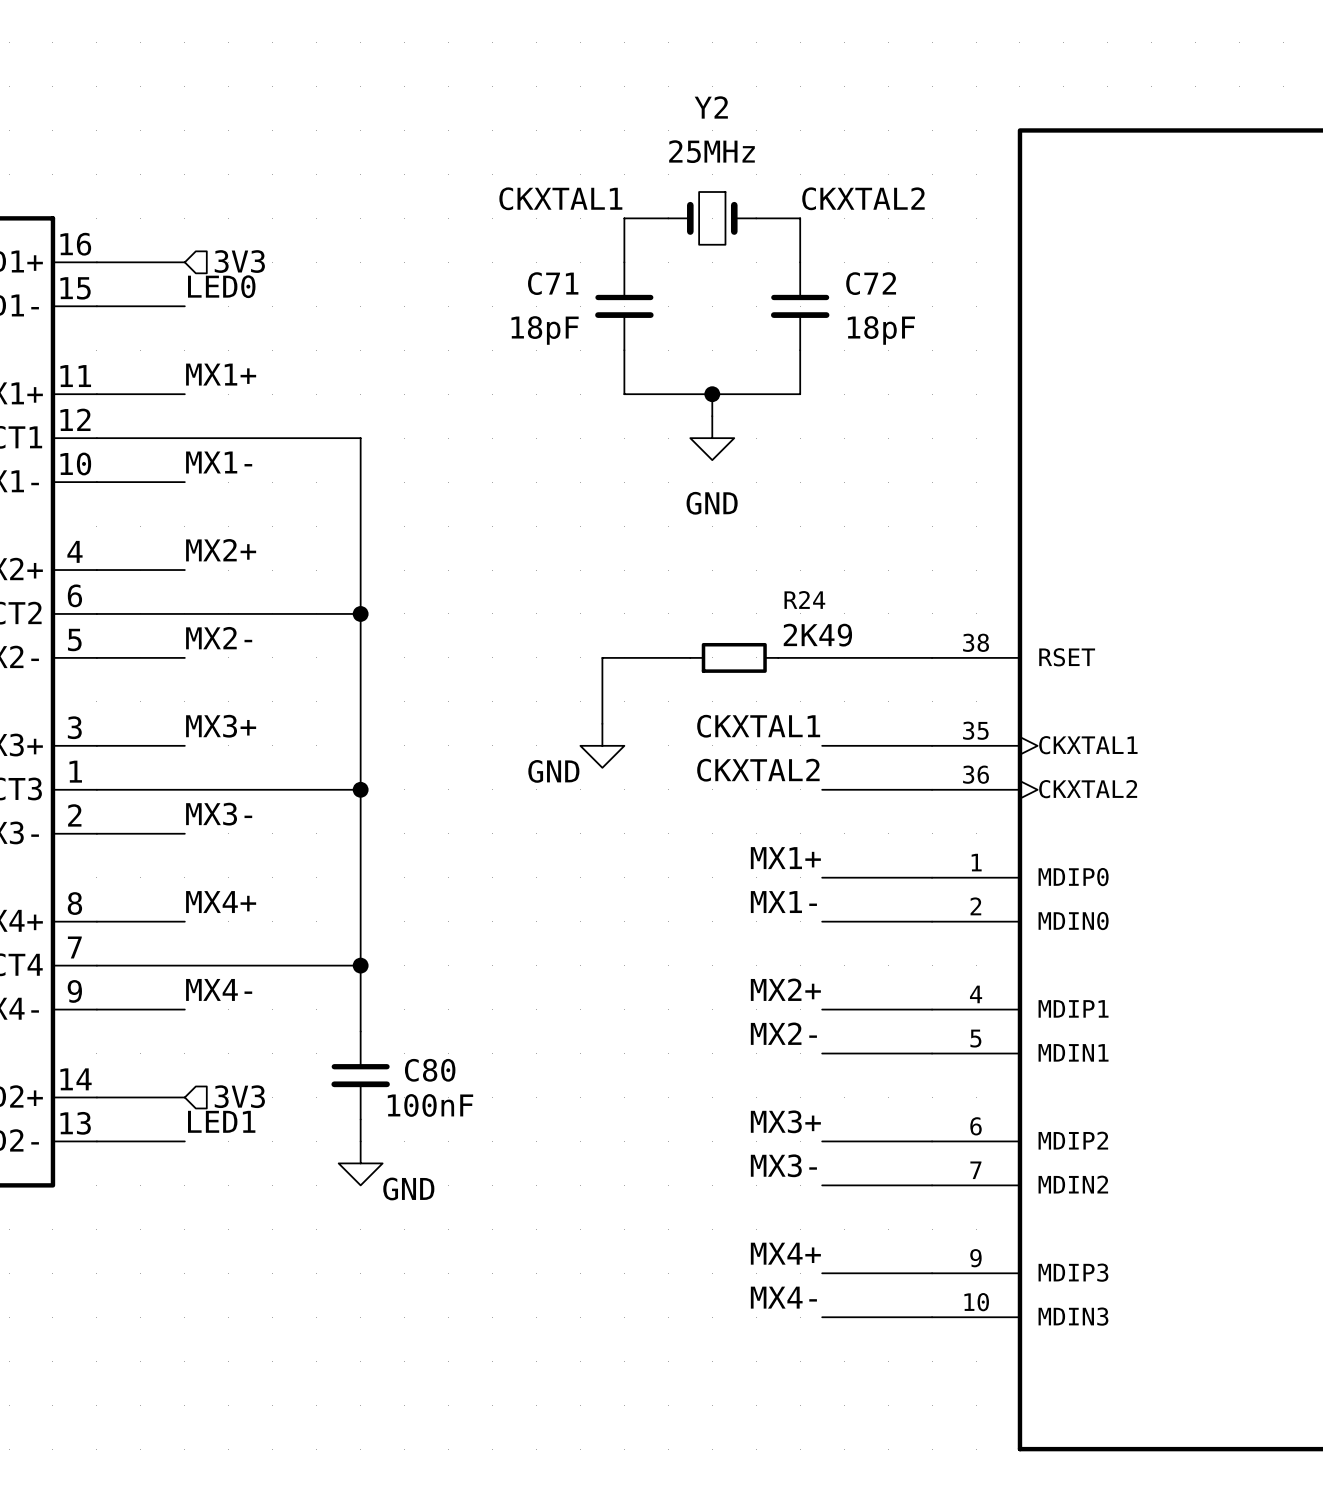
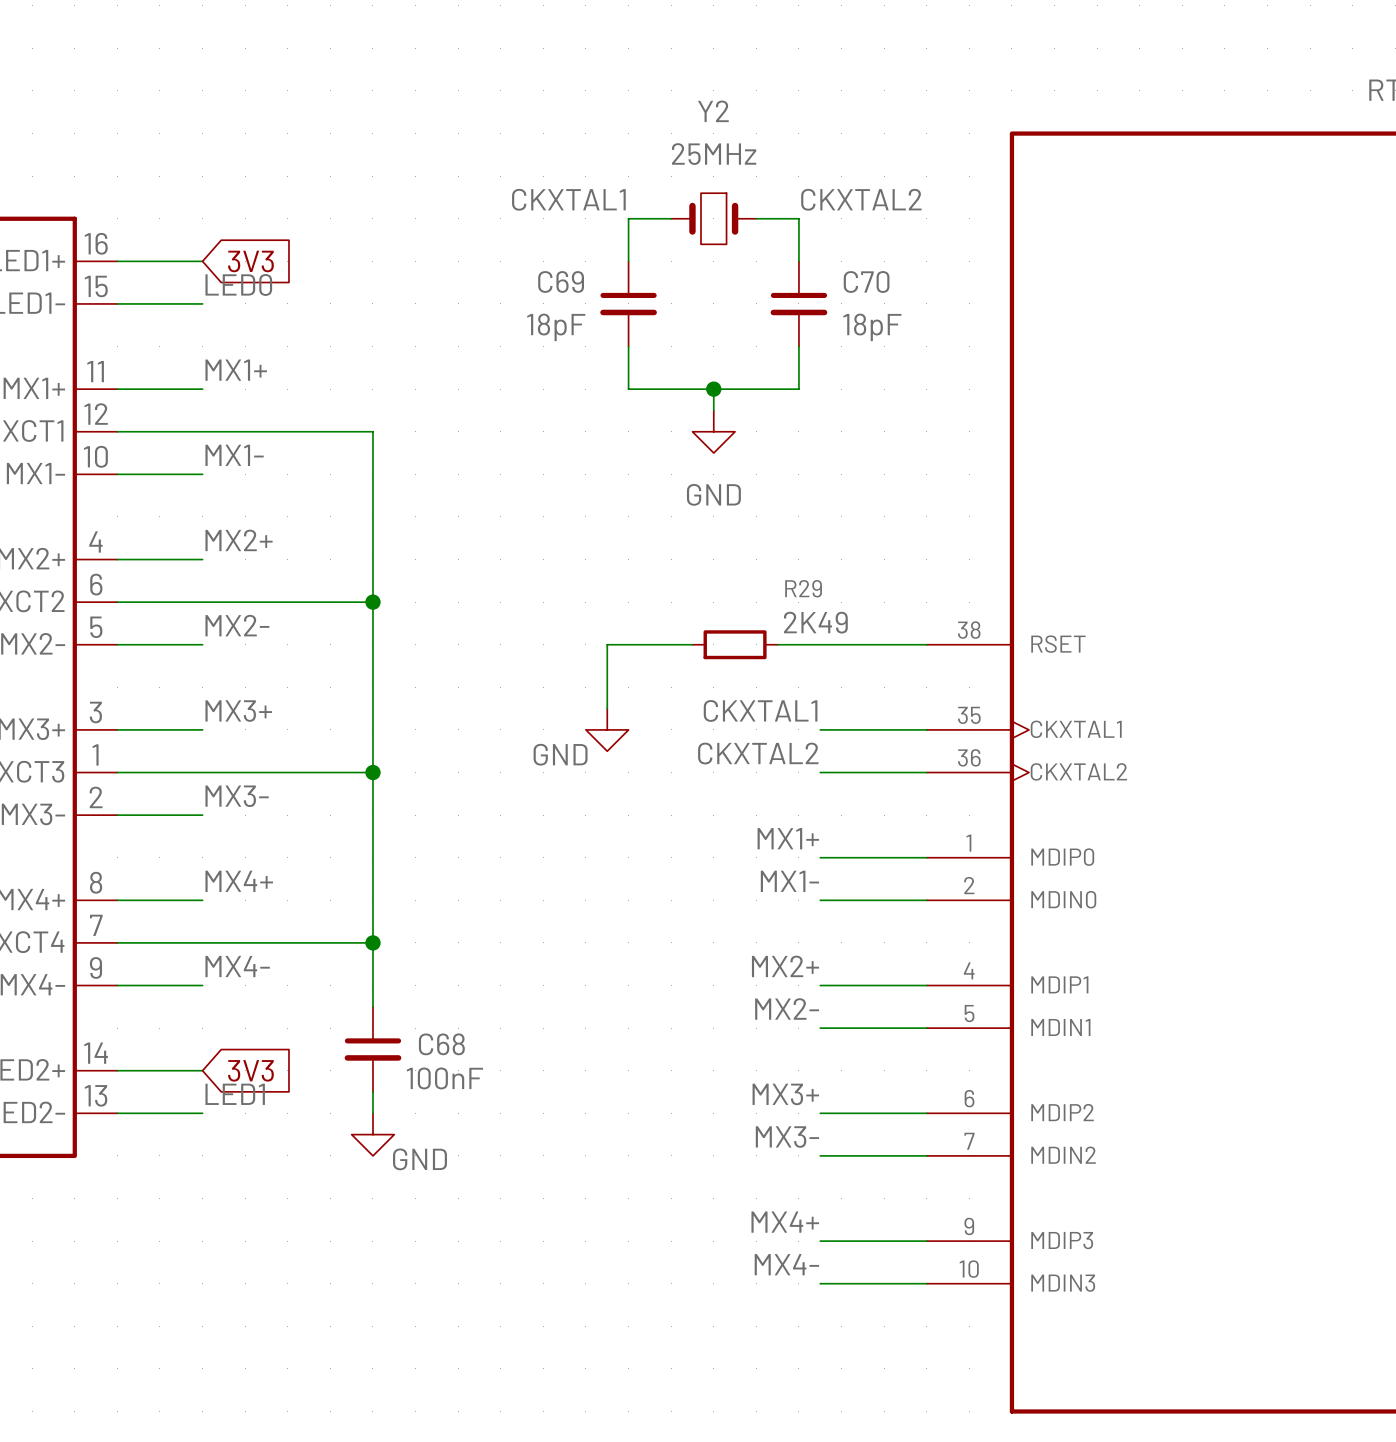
hierarchical label: 3V3 (239, 261) -> none
global label: none -> 3V3 (250, 261)
C71 name: C71 (553, 283) -> C69 (561, 281)
C72 name: C72 (871, 283) -> C70 (866, 281)
R24 name: R24 (804, 599) -> R29 (803, 588)
C80 name: C80 (430, 1070) -> C68 (441, 1044)
hierarchical label: 3V3 (239, 1096) -> none
global label: none -> 3V3 (250, 1070)

